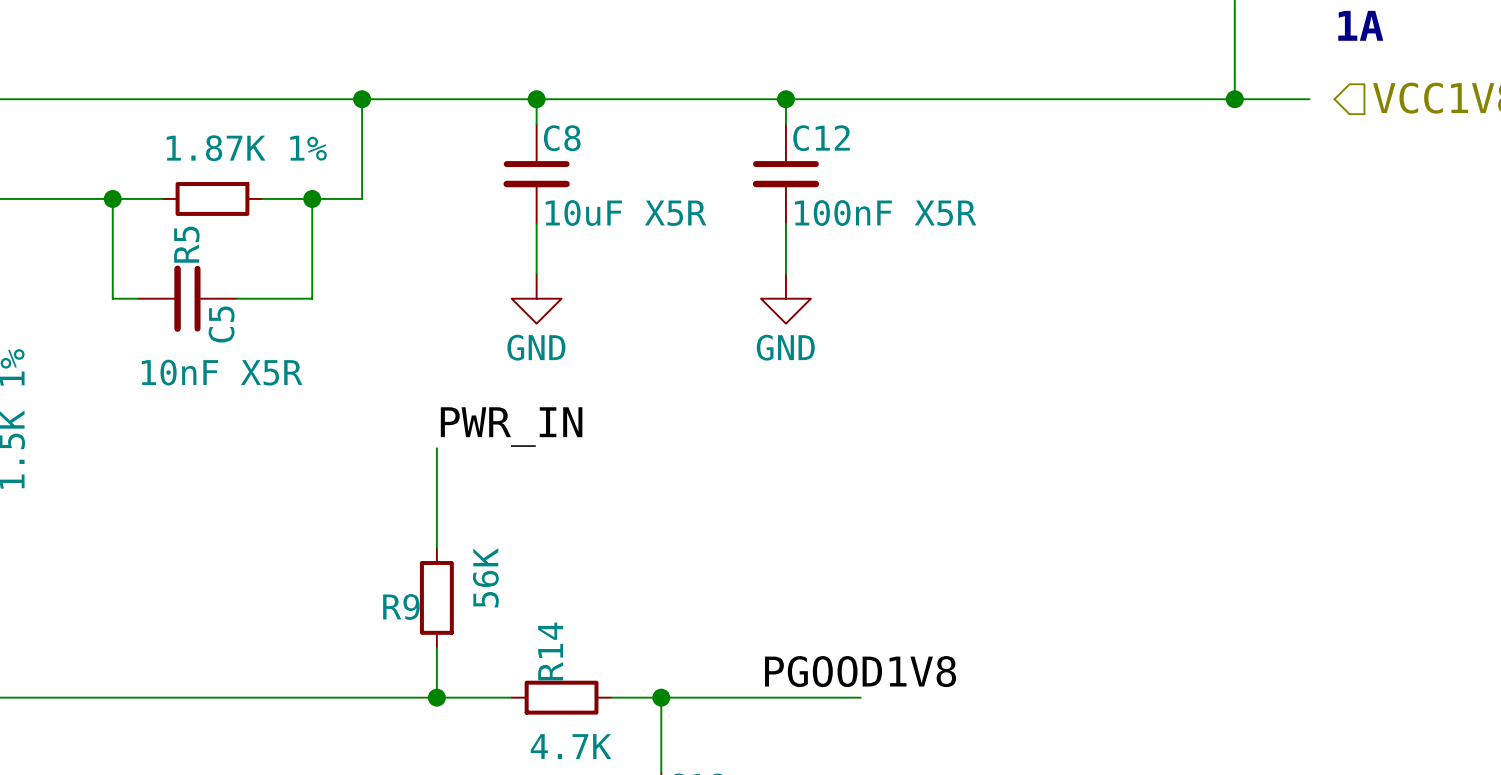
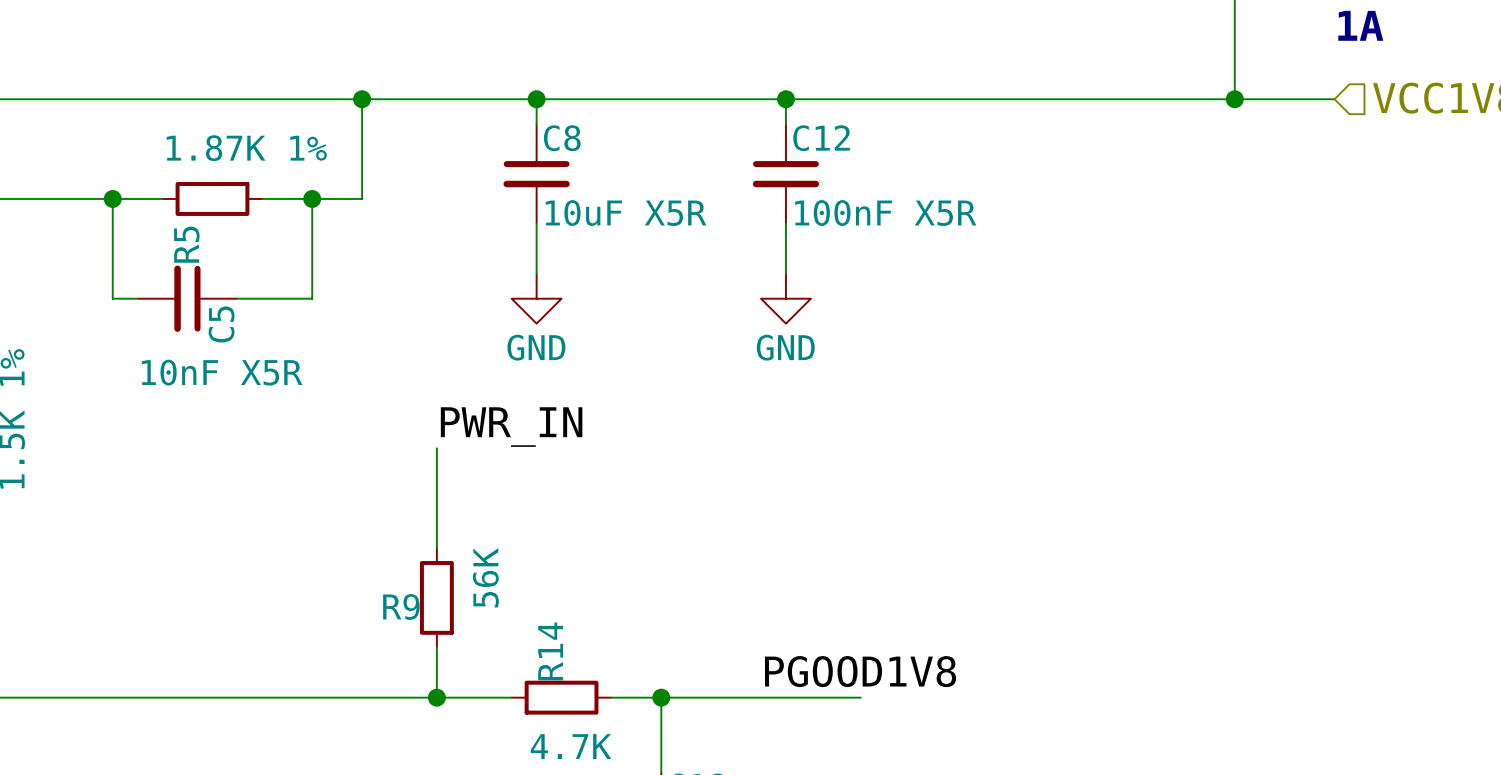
wire: none -> (1309, 99) (1334, 99)

